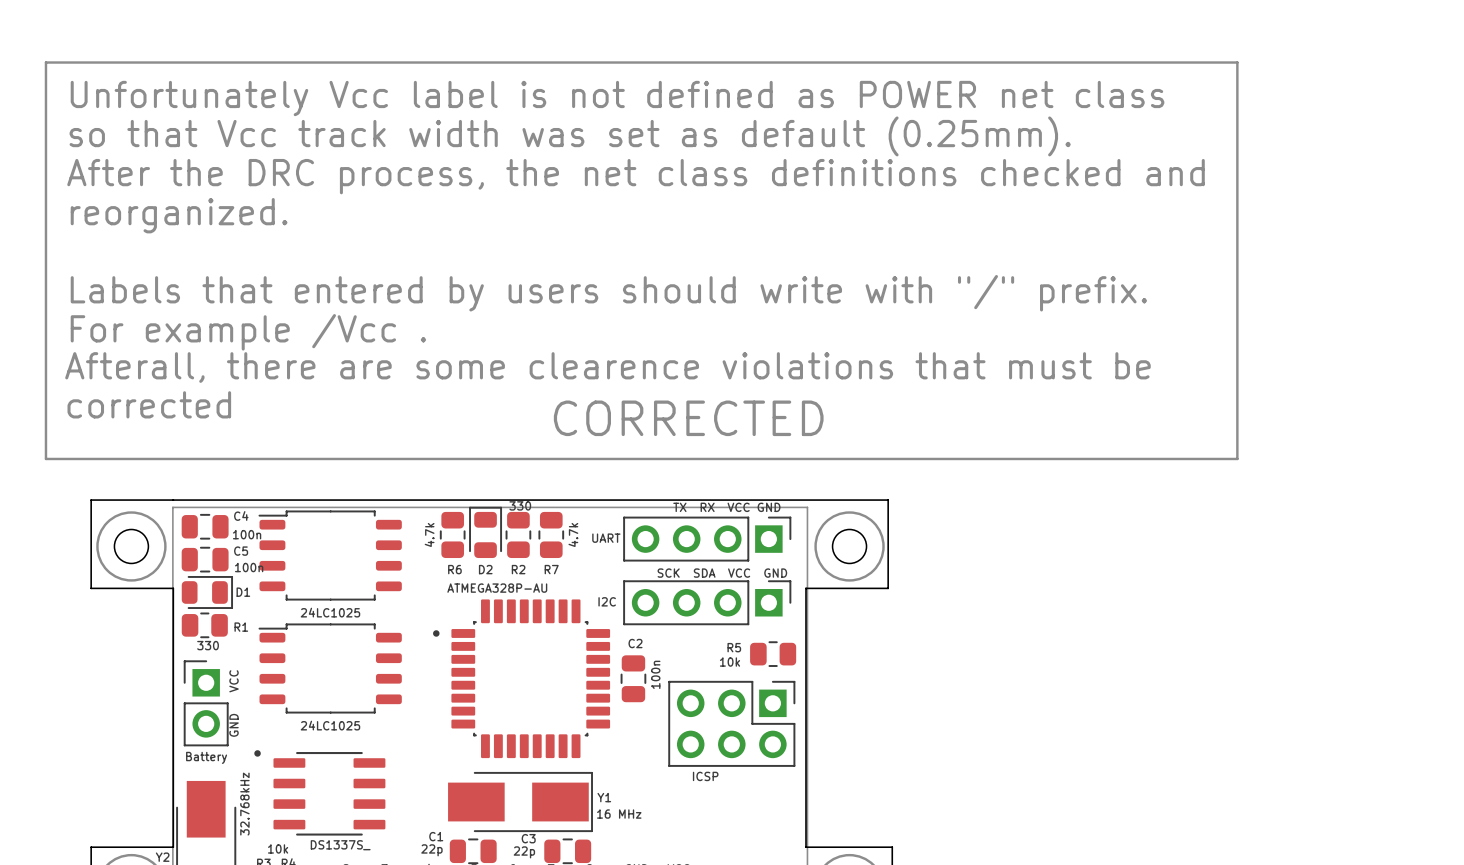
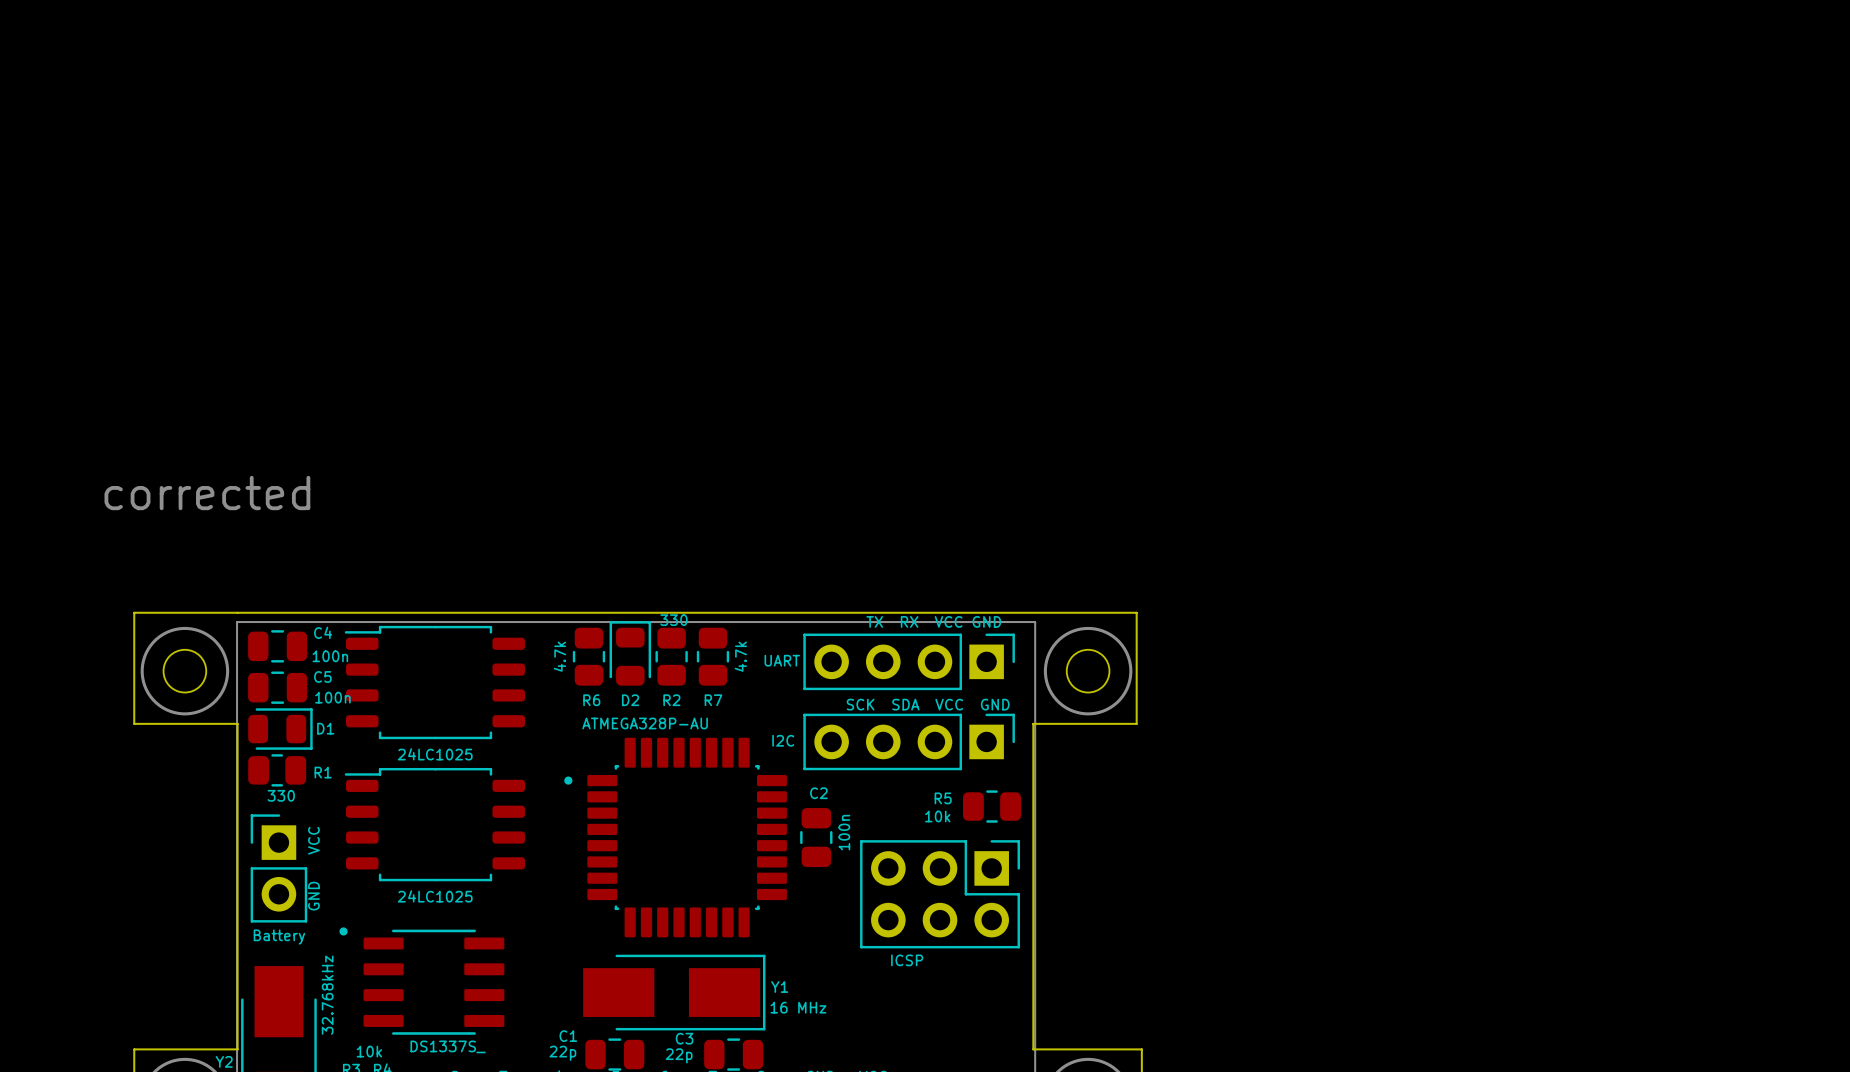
line: (45, 62) (1237, 62) (1237, 458) (45, 458) (45, 62) -> none
text: Unfortunately Vcc label is not defined as POWER net class (617, 98) -> none
text: so that Vcc track width was set as default (0.25mm). (570, 136) -> none
text: After the DRC process, the net class definitions checked and (636, 176) -> none
text: reorganized. (179, 215) -> none
text: Labels that entered by users should write with "/" prefix. (608, 293) -> none
text: For example /Vcc . (248, 332) -> none
text: Afterall, there are some clearence violations that must be (607, 367) -> none
text: CORRECTED (688, 418) -> none

